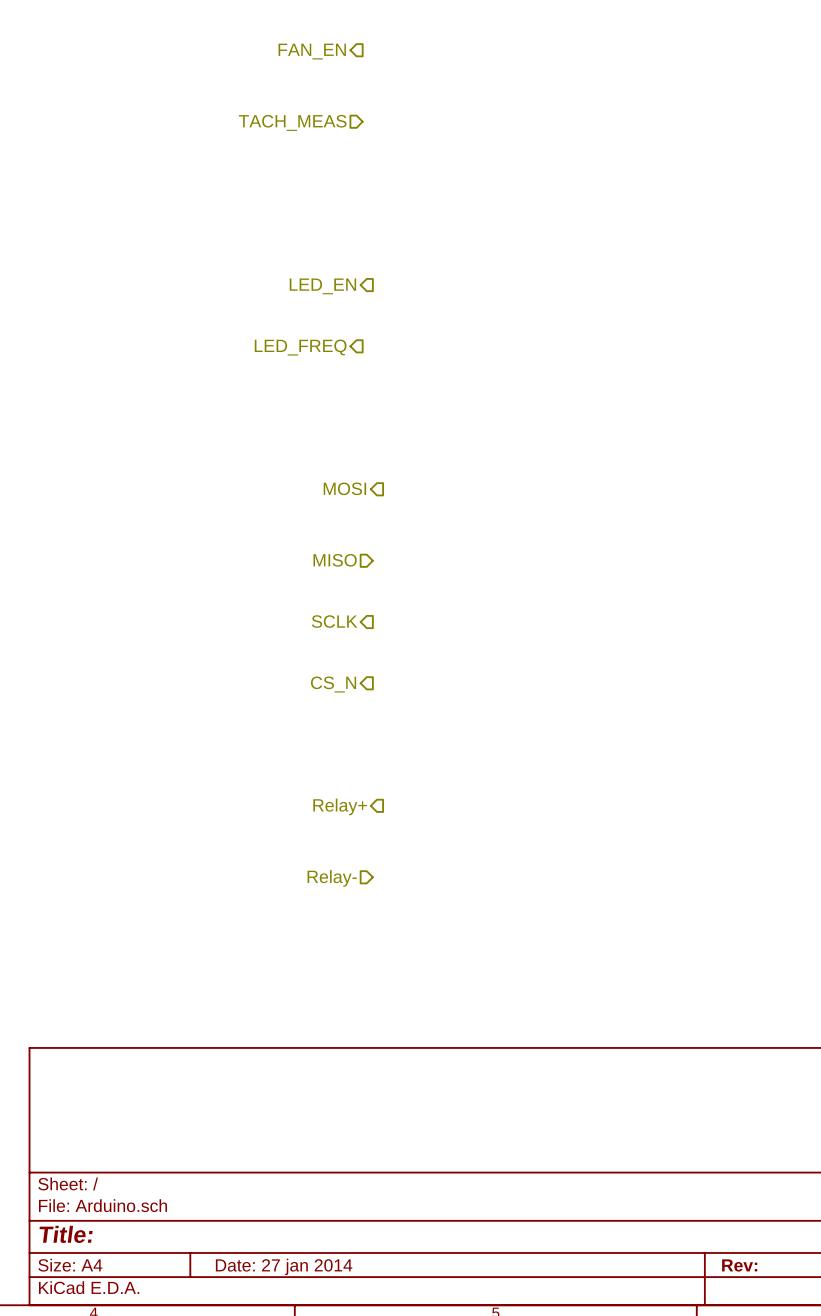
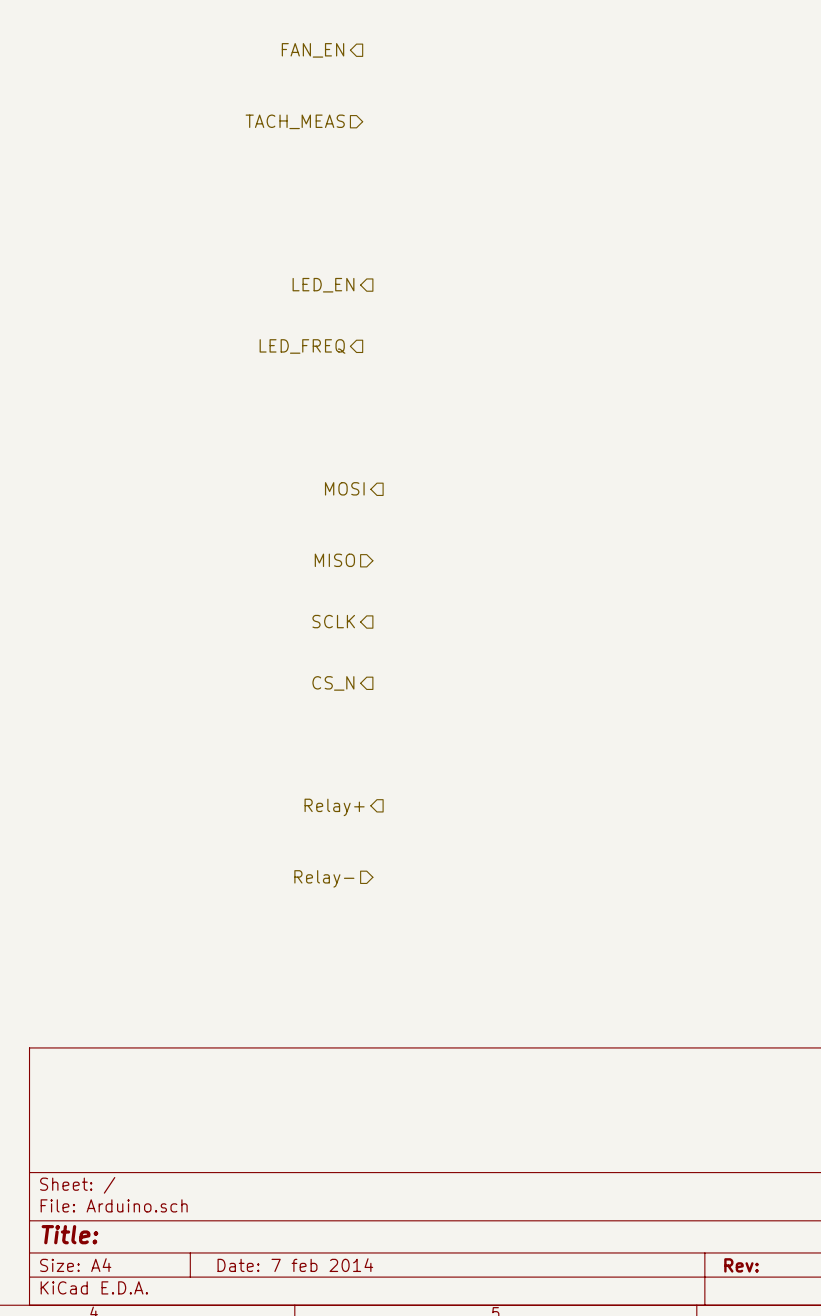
title block: Date: 27 jan 2014 (284, 1266) -> Date: 7 feb 2014 (295, 1265)

